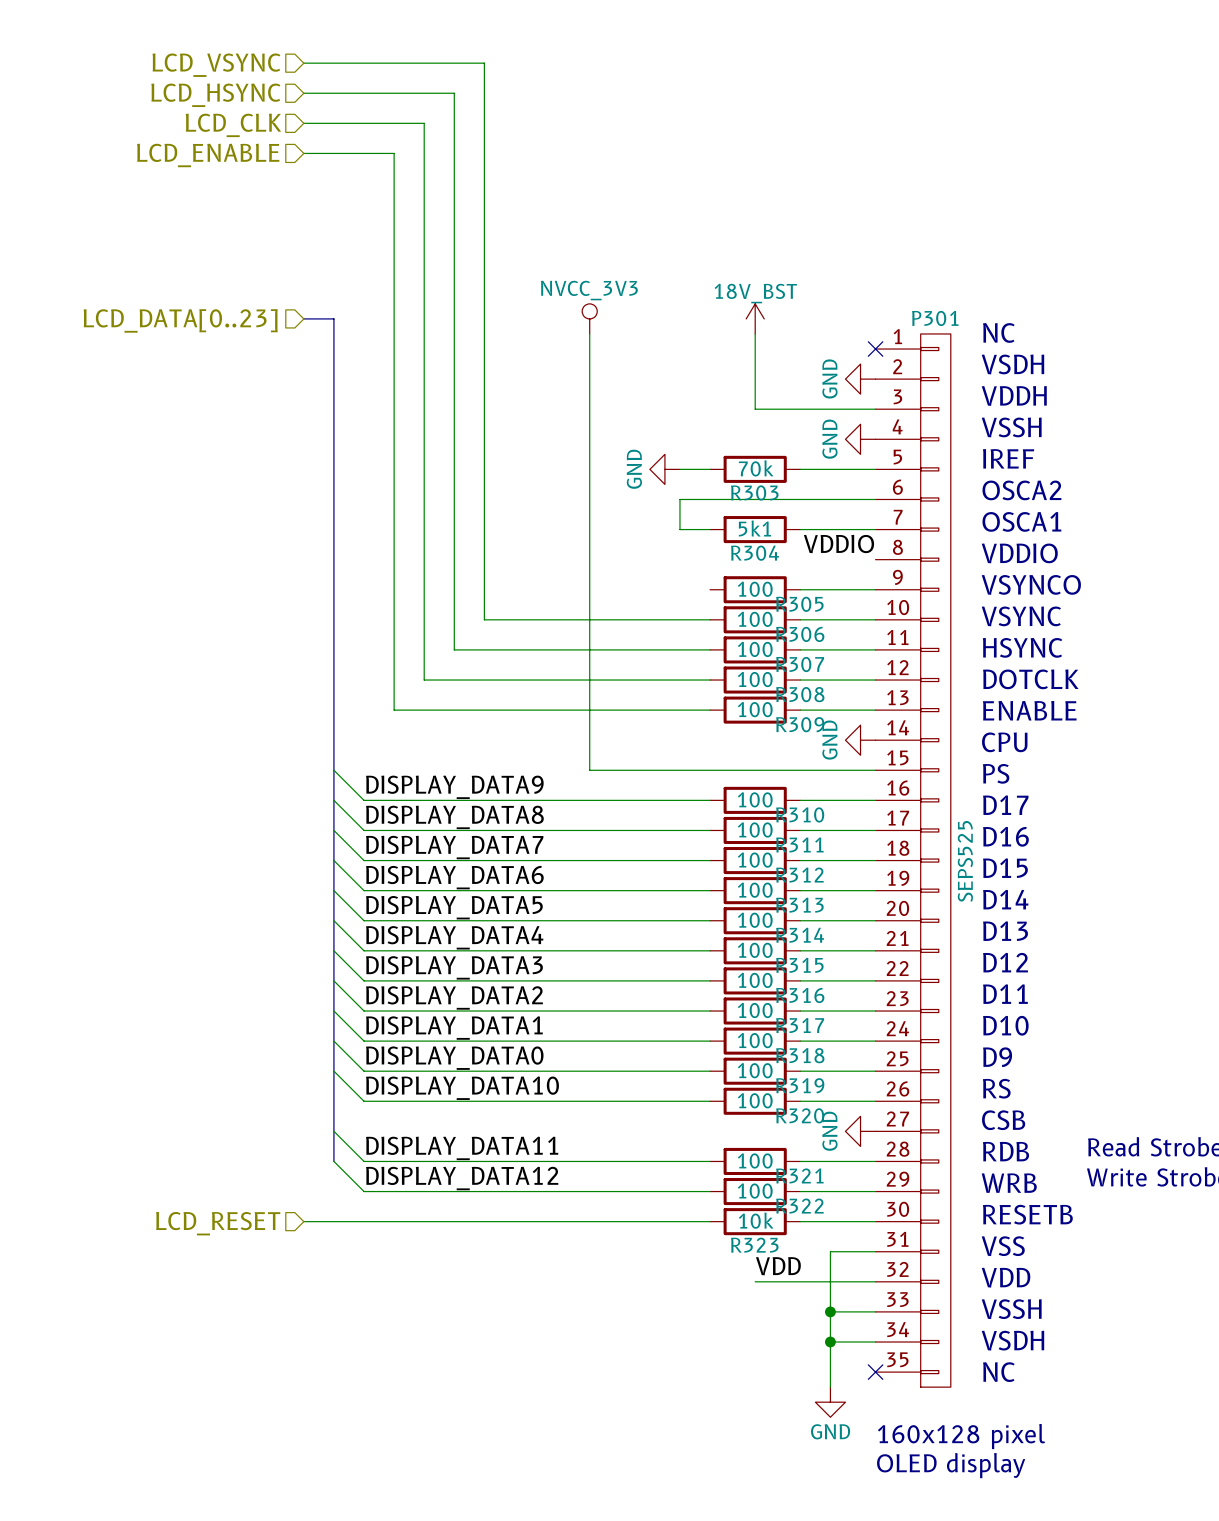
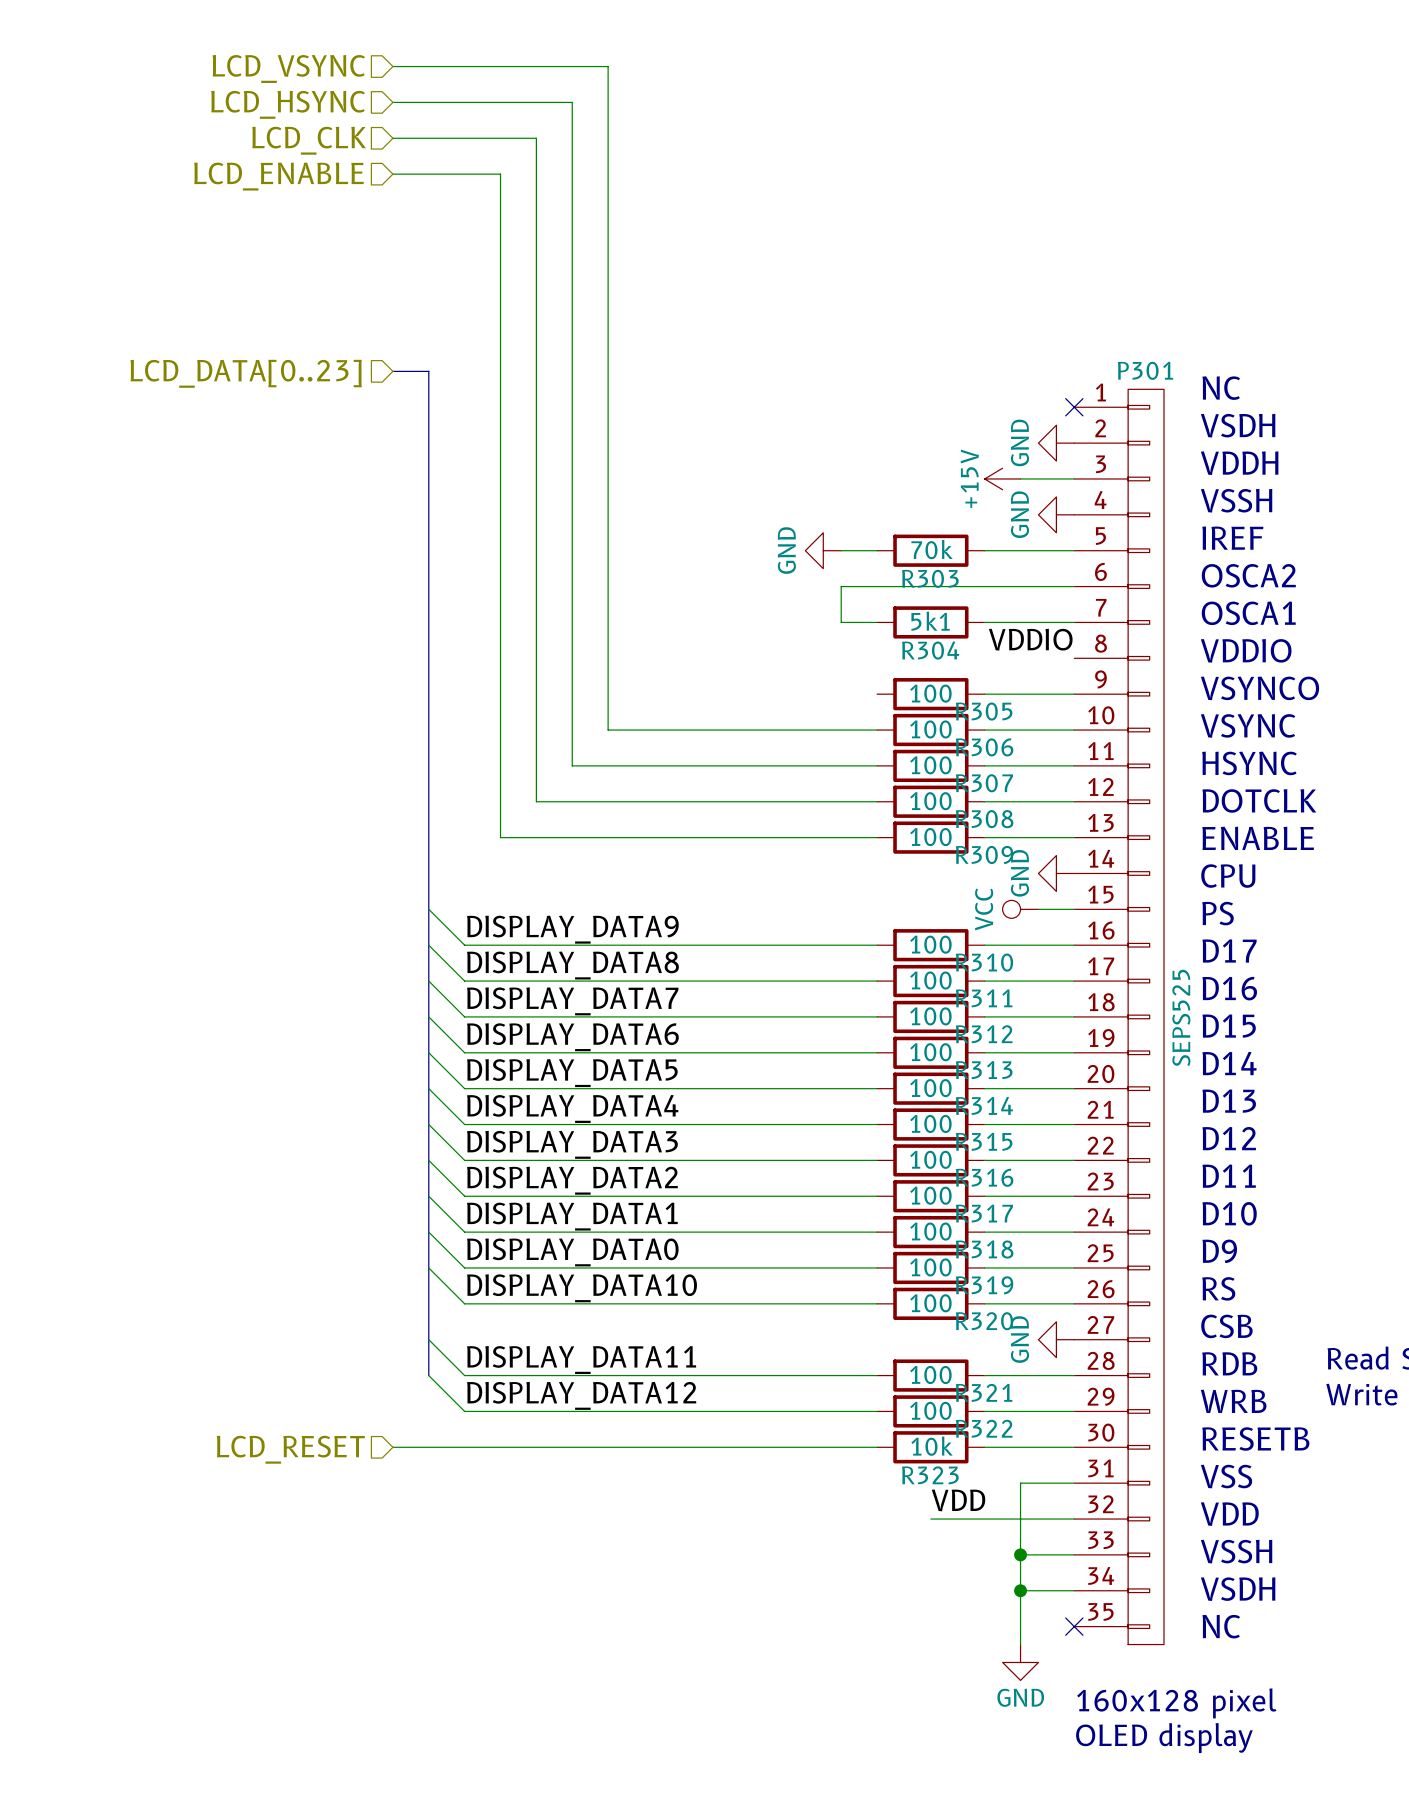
power symbol: NVCC_3V3 (589, 318) -> none
power symbol: 18V_BST (755, 318) -> none
wire: (589, 333) (589, 770) (845, 770) -> none
wire: (755, 333) (755, 409) (830, 409) -> none
power symbol: none -> +15V (1002, 478)
power symbol: none -> VCC (1020, 909)

